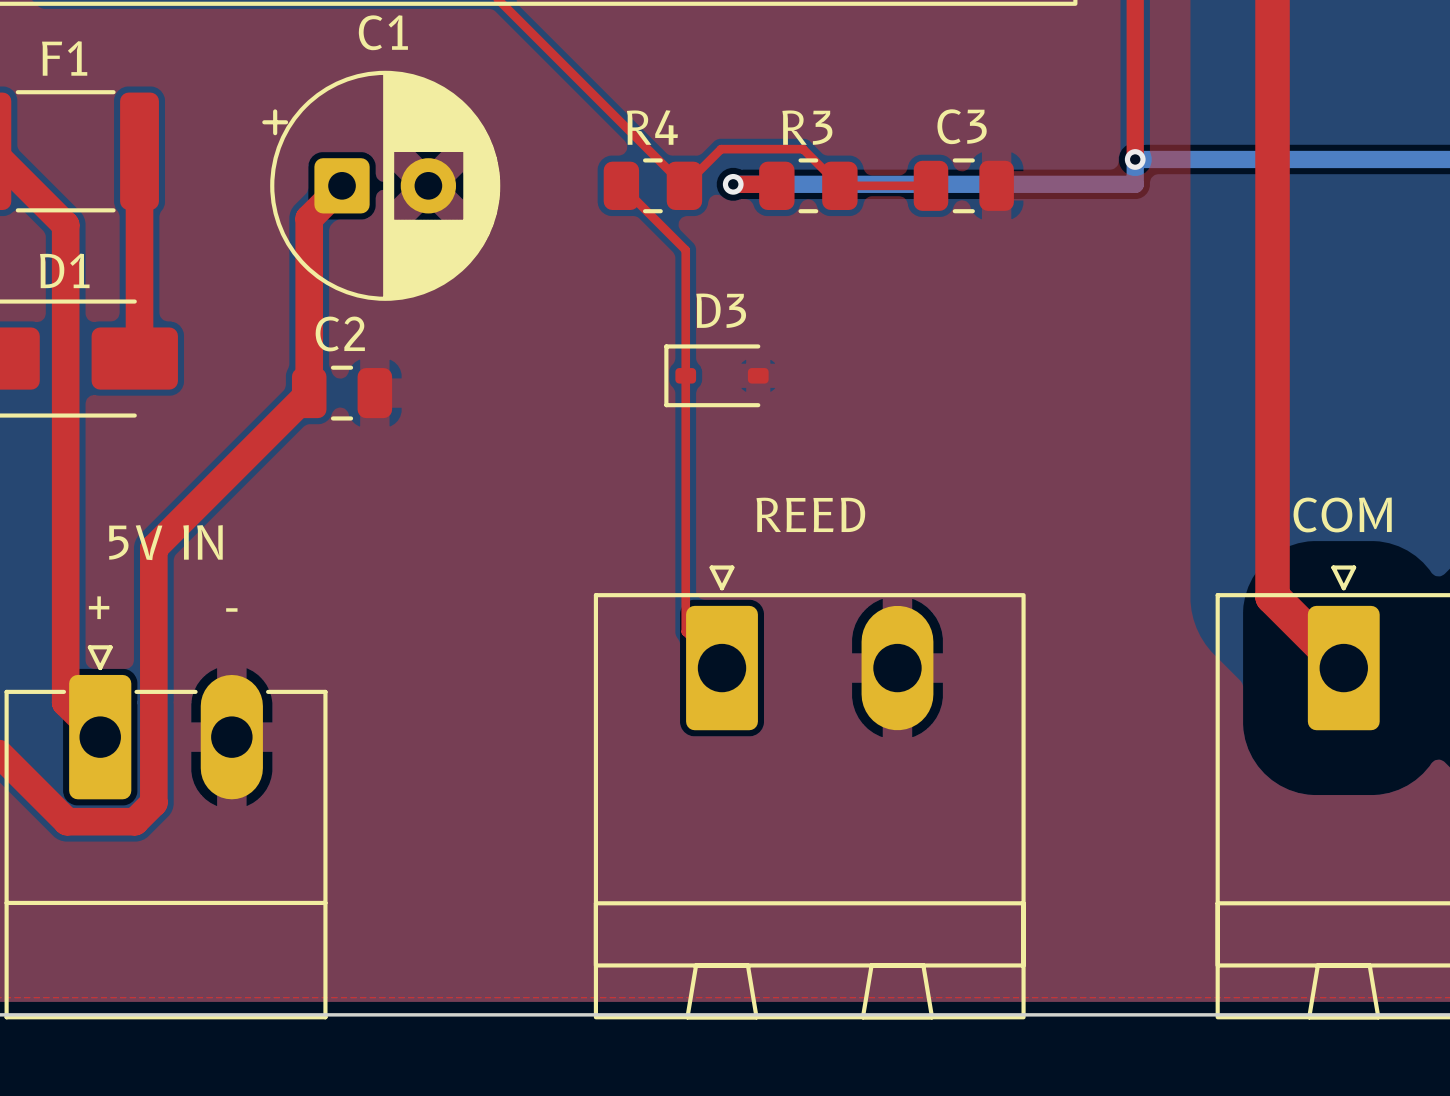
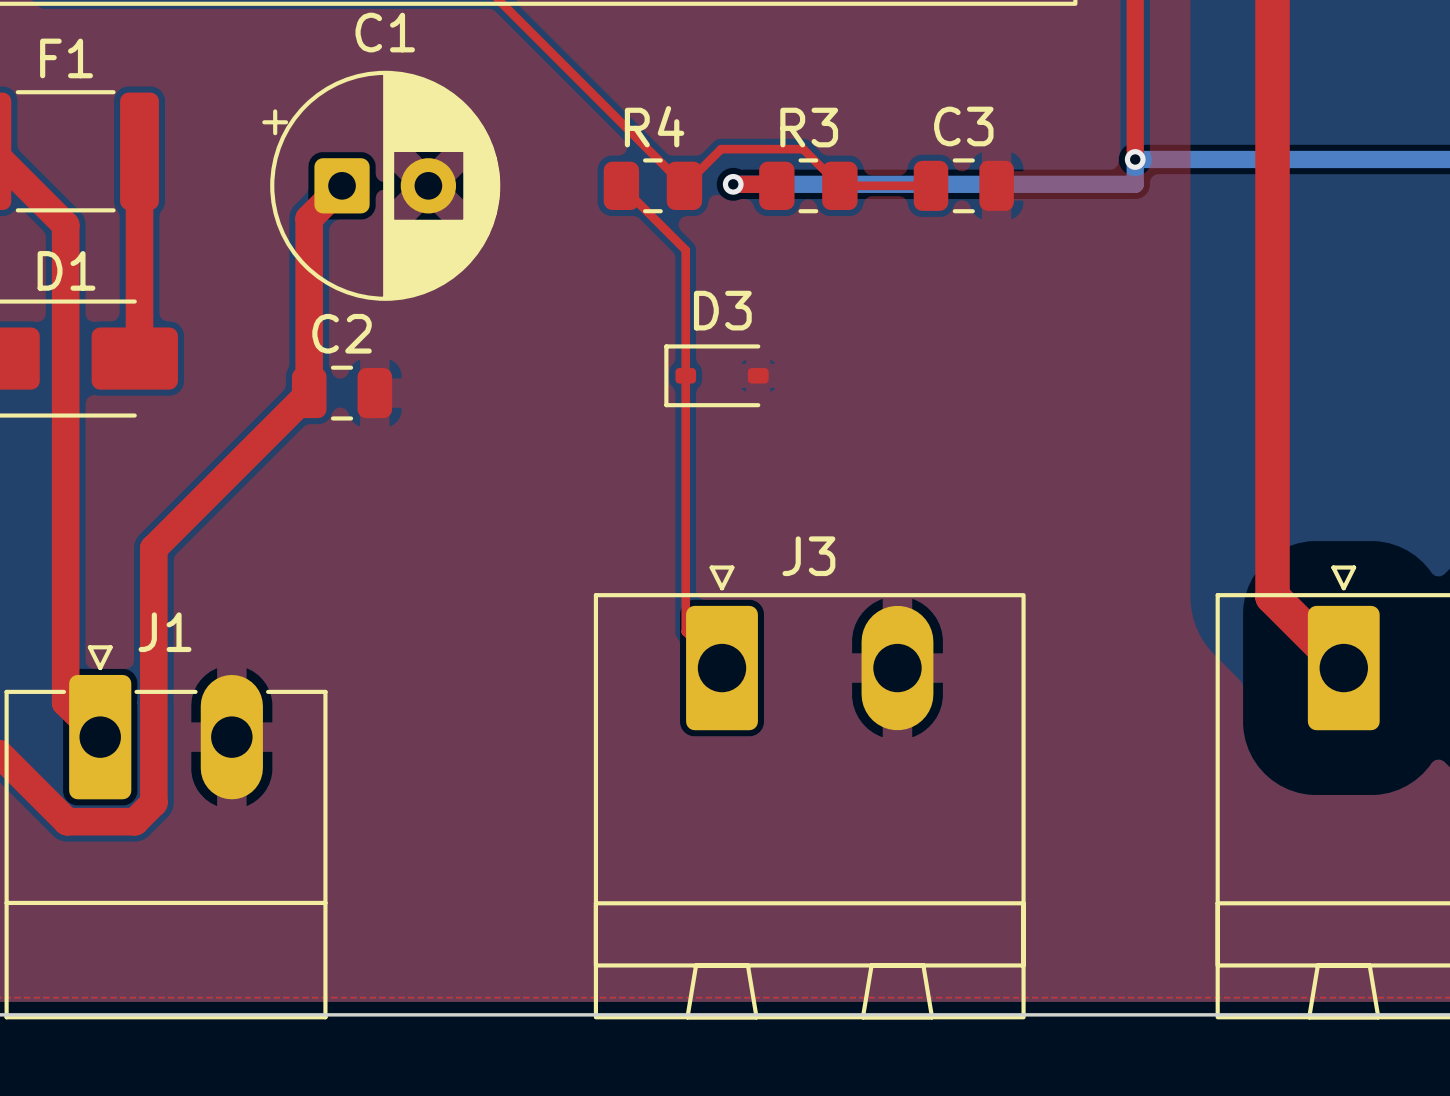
text: REED (810, 514) -> none
text: COM (1342, 514) -> none
text: 5V IN (165, 542) -> none
J3 name: none -> J3 (808, 556)
text: + (99, 607) -> none
text: - (231, 609) -> none
J1 name: none -> J1 (165, 632)

